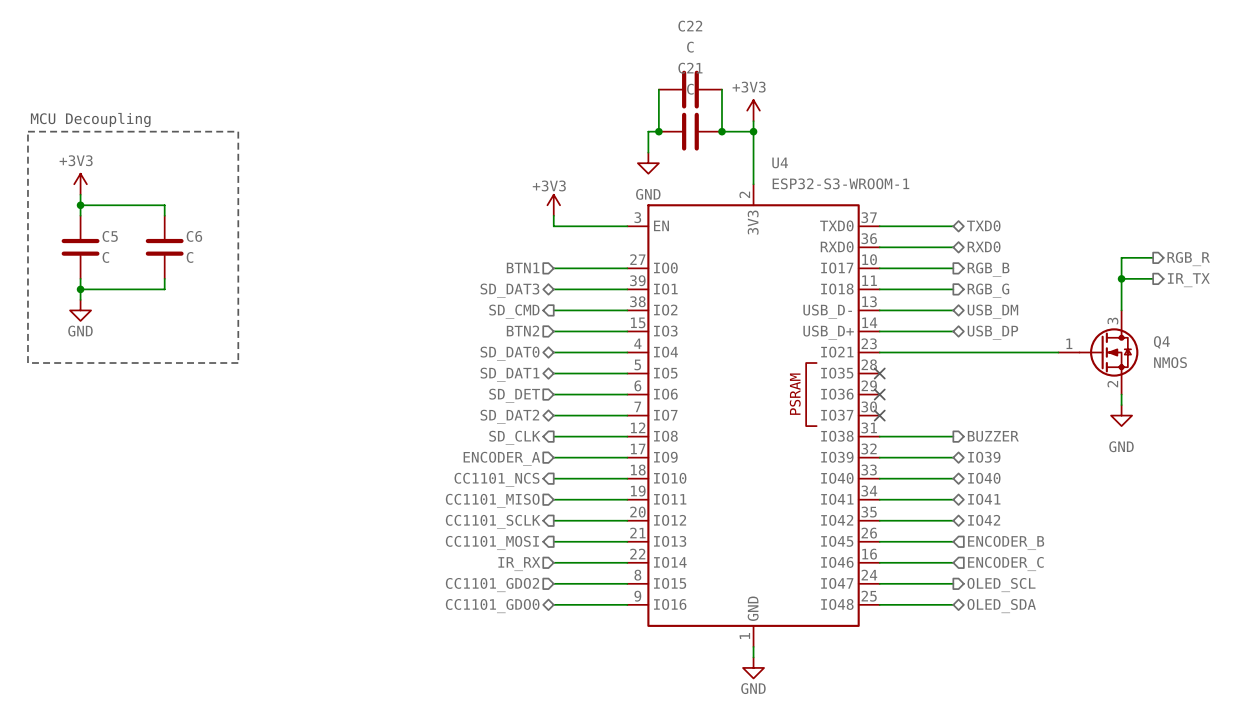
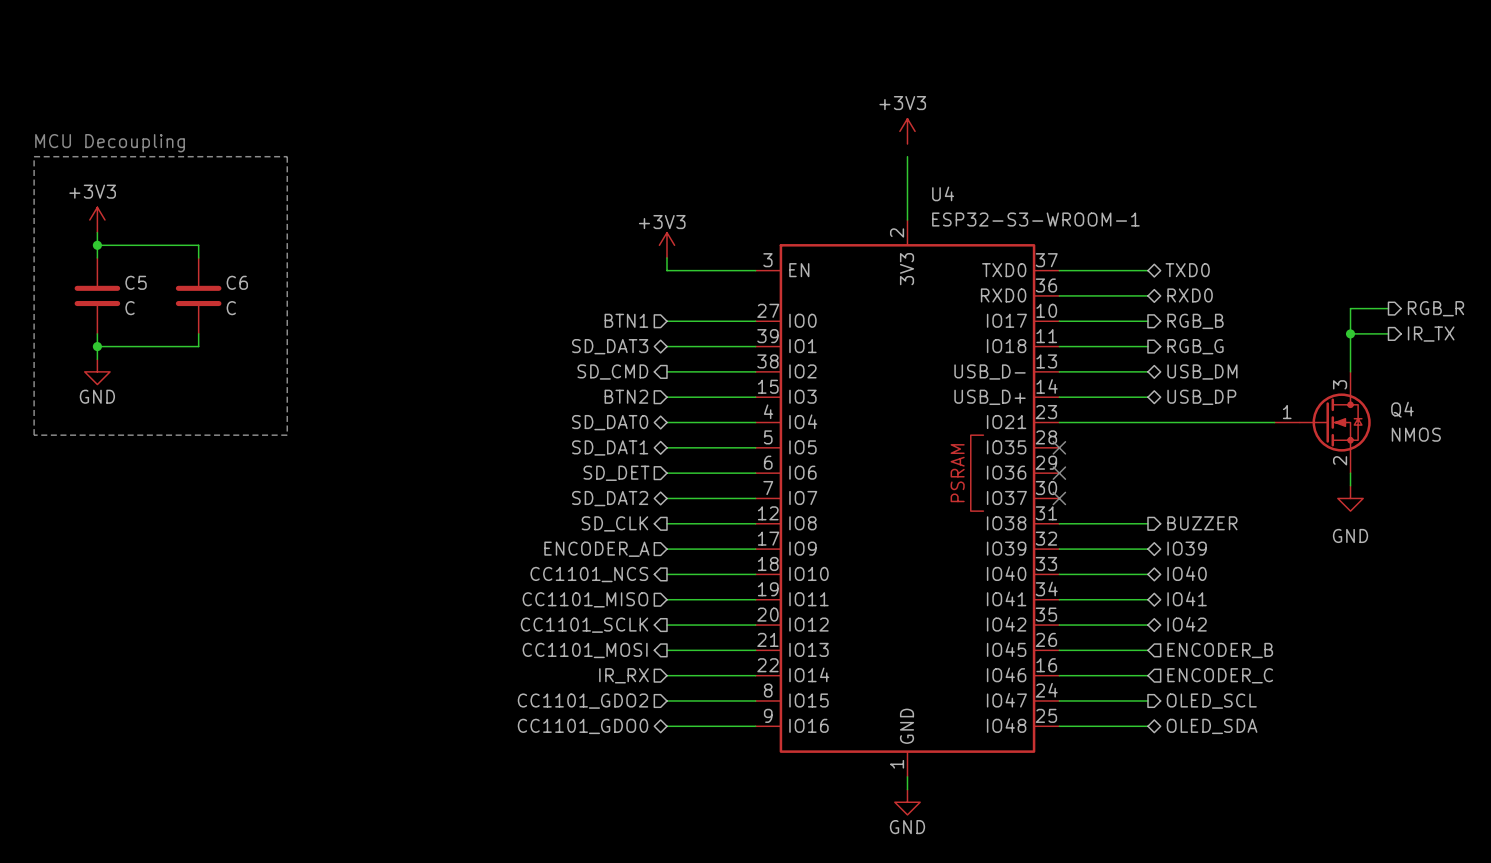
wire: (658, 89) (658, 131) (648, 131) (648, 152) -> none
C22: C (690, 89) -> none
wire: (721, 89) (721, 131) (753, 131) (753, 121) -> none
junction: (658, 131) -> none
C21: C (690, 131) -> none
junction: (721, 131) -> none
junction: (753, 131) -> none
power symbol: GND (648, 163) -> none

